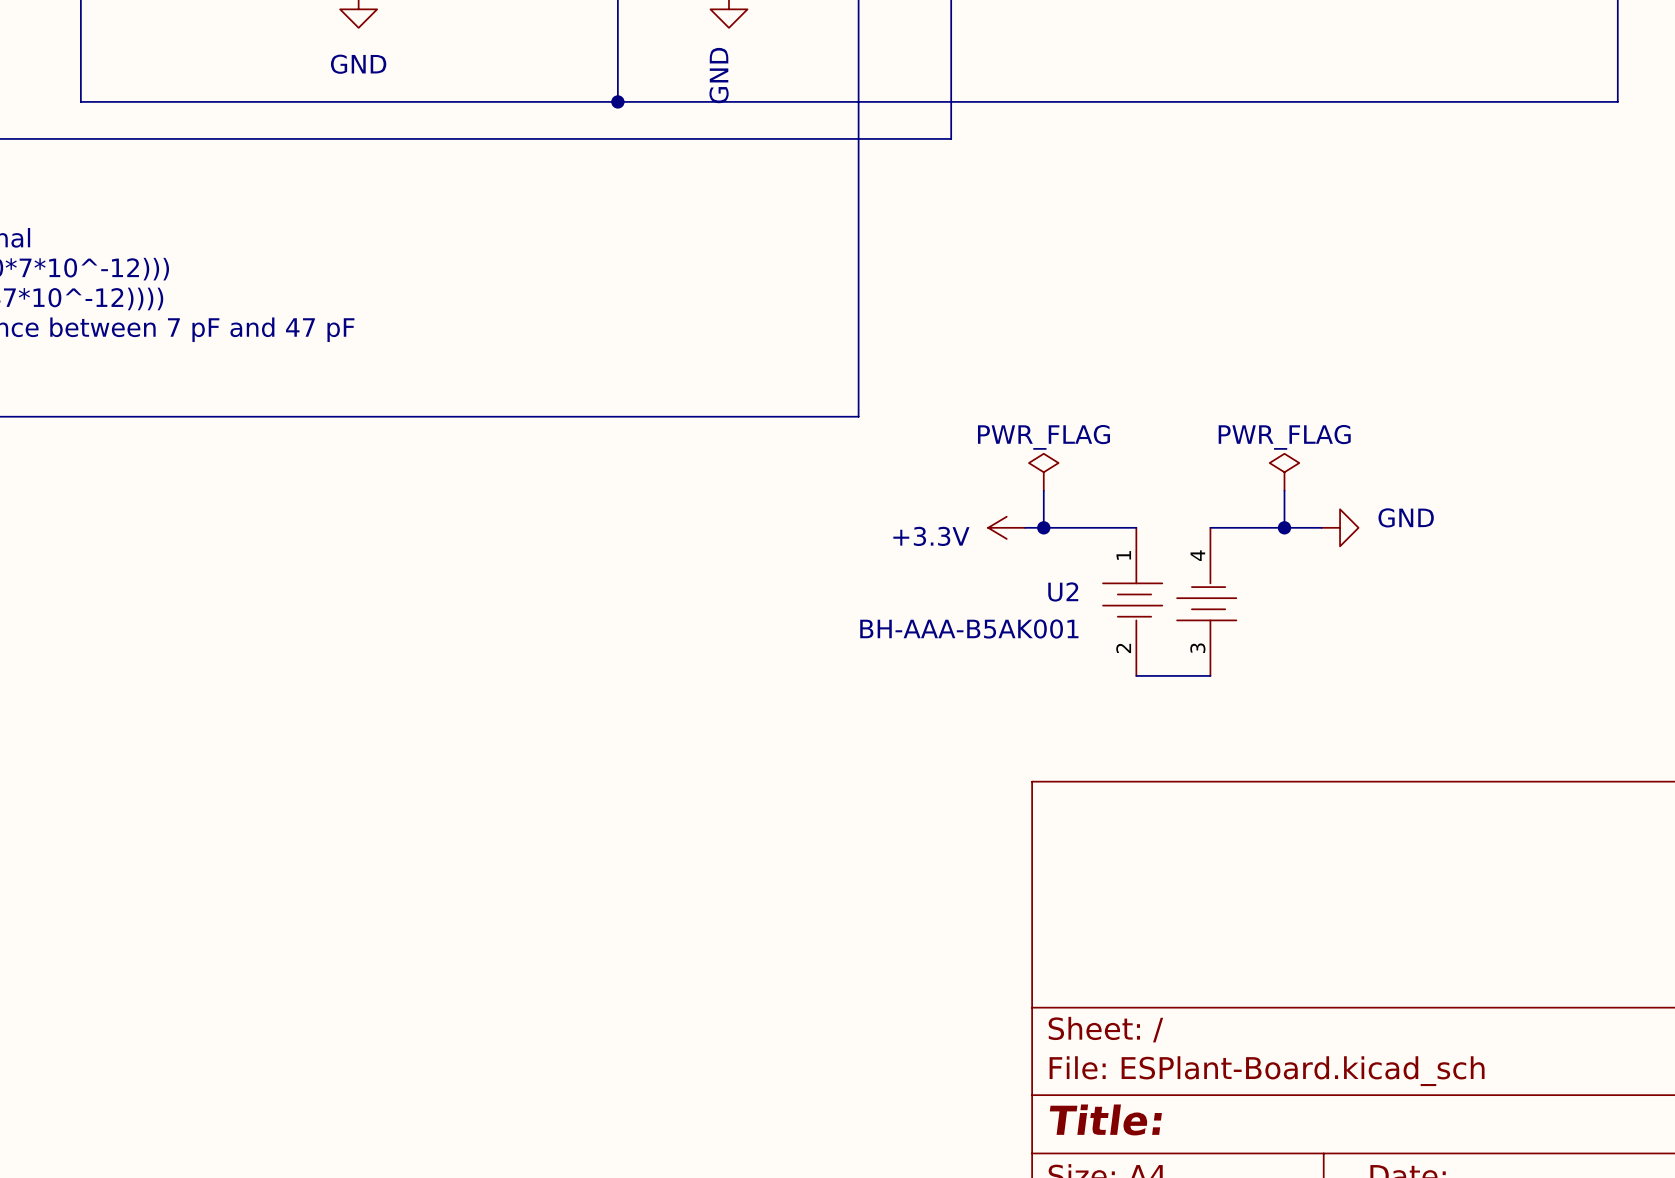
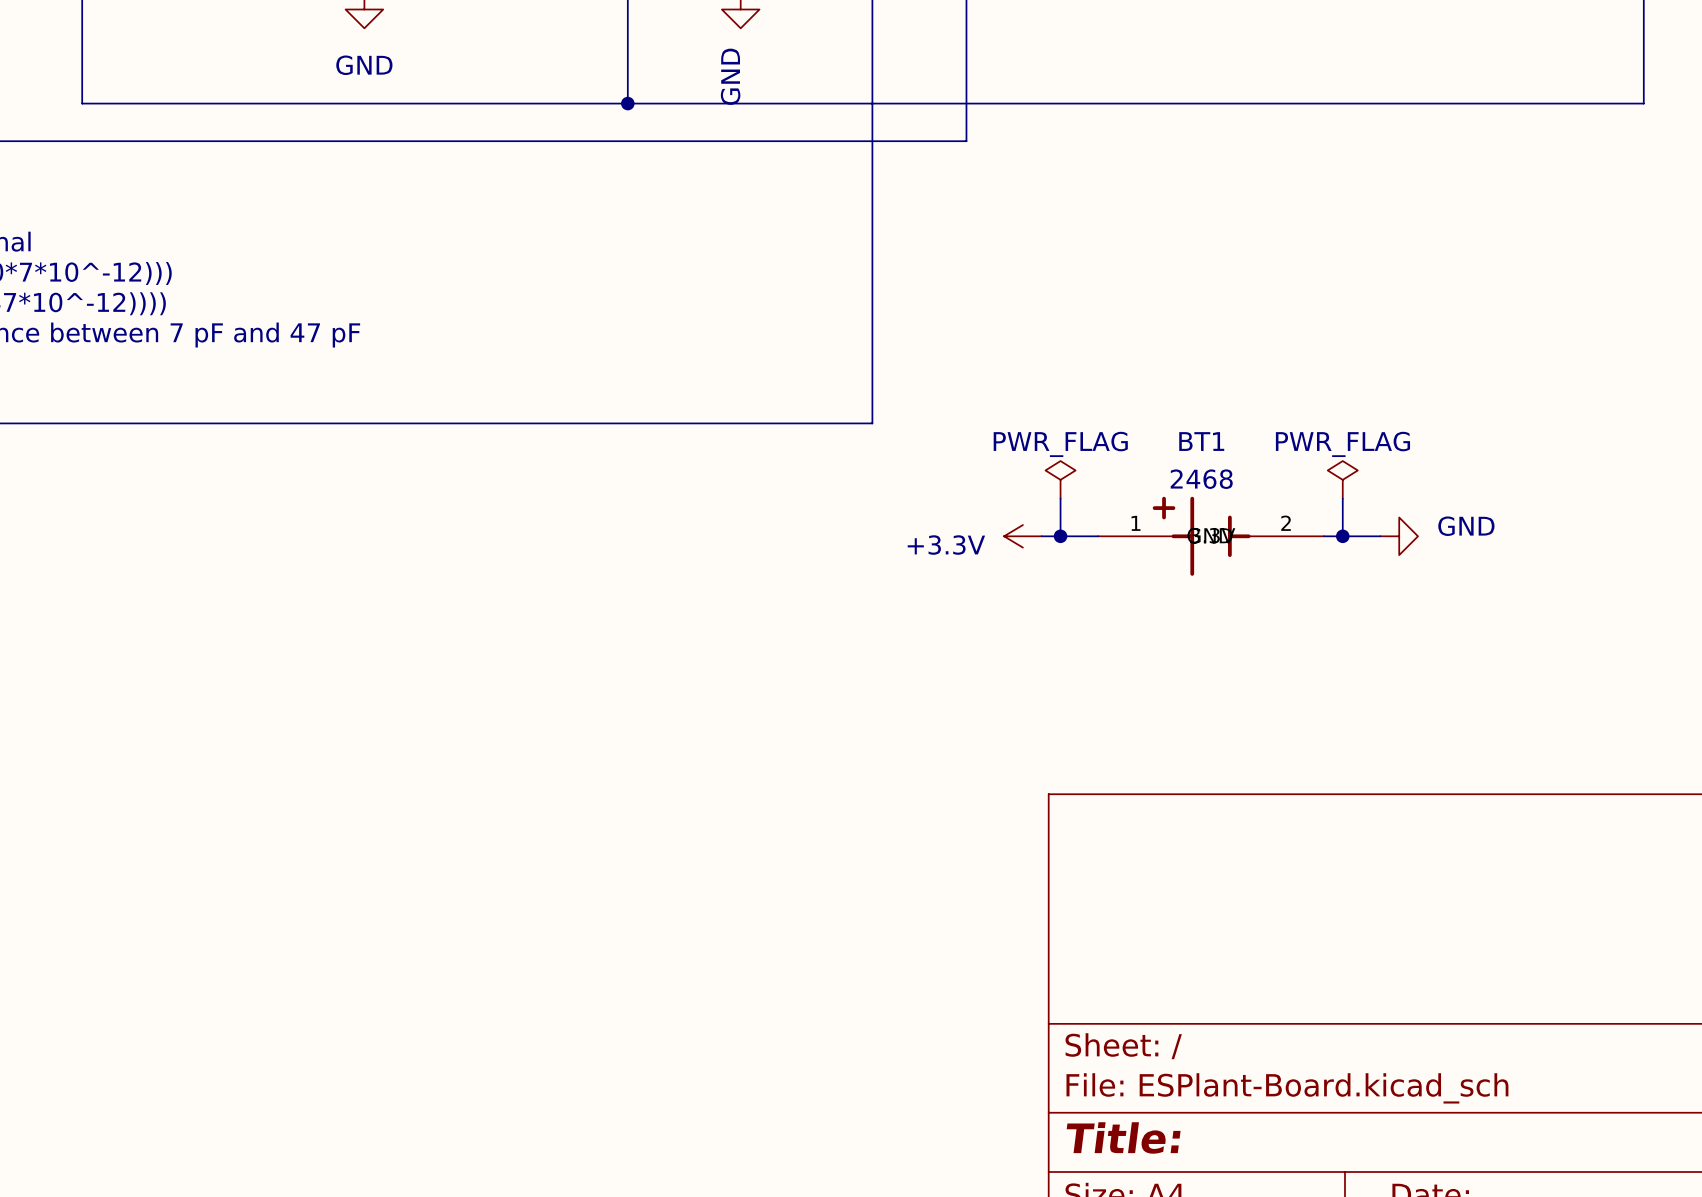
power symbol position: PWR_FLAG (1284, 472) -> PWR_FLAG (1342, 479)
wire: (1284, 490) (1284, 527) -> none
wire: none -> (1342, 498) (1342, 536) (1380, 536)
BT1: none -> 2468 (1211, 536)
junction position: (1284, 527) -> (1342, 536)
power symbol position: GND (1340, 527) -> GND (1399, 536)
U2: BH-AAA-B5AK001 (1169, 601) -> none
wire: (1136, 675) (1210, 675) -> none

